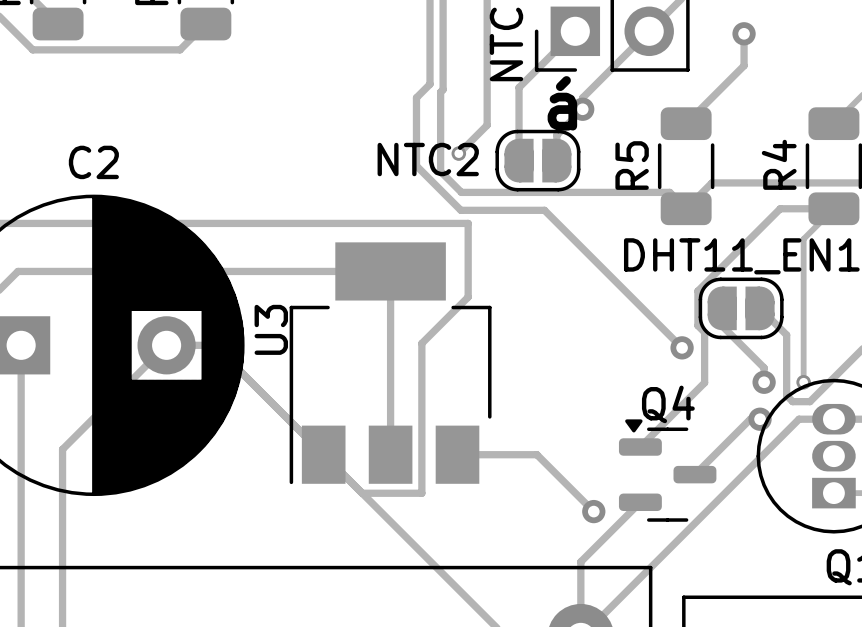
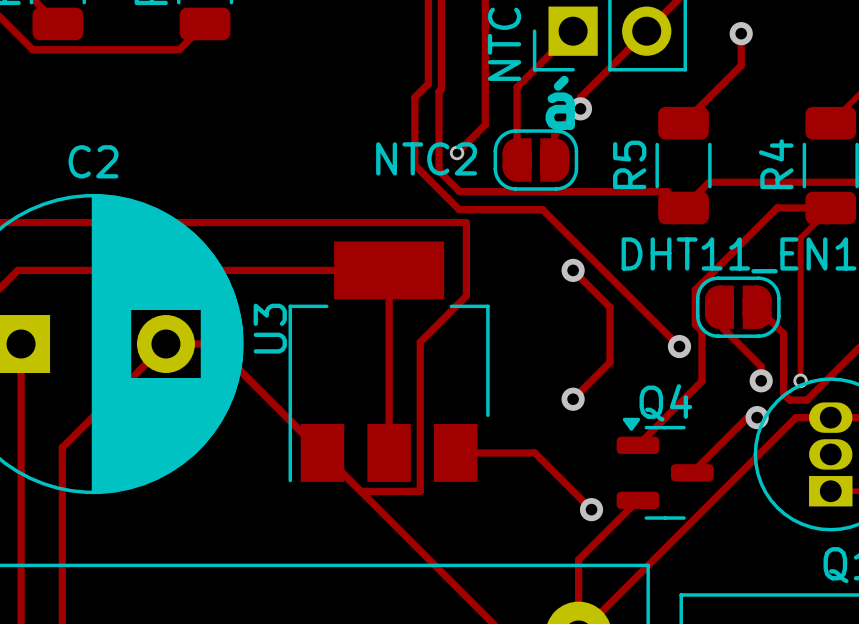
track: none -> (573, 270) (609, 307) (609, 362) (573, 399)
via: none -> (573, 270)
via: none -> (573, 399)

